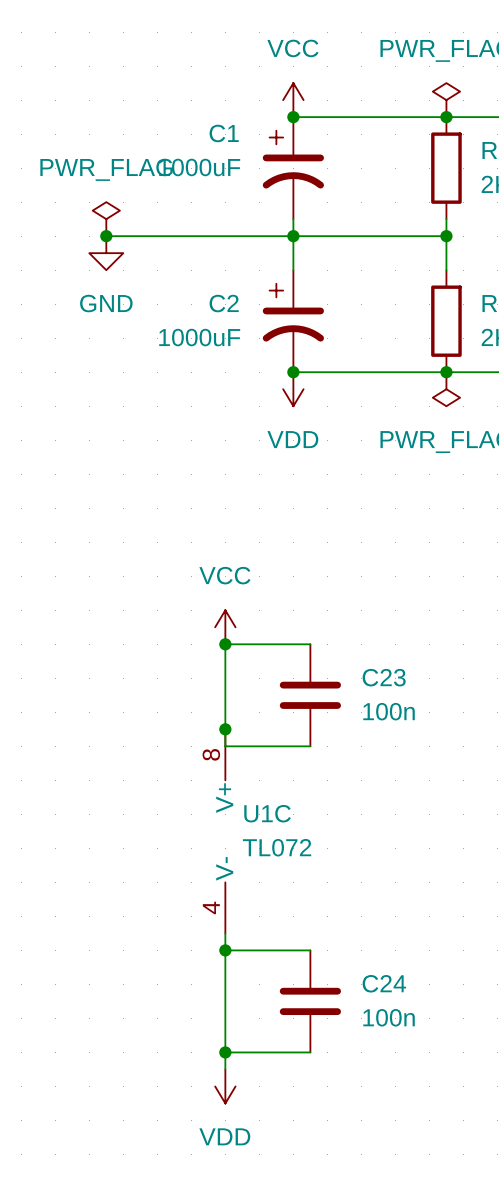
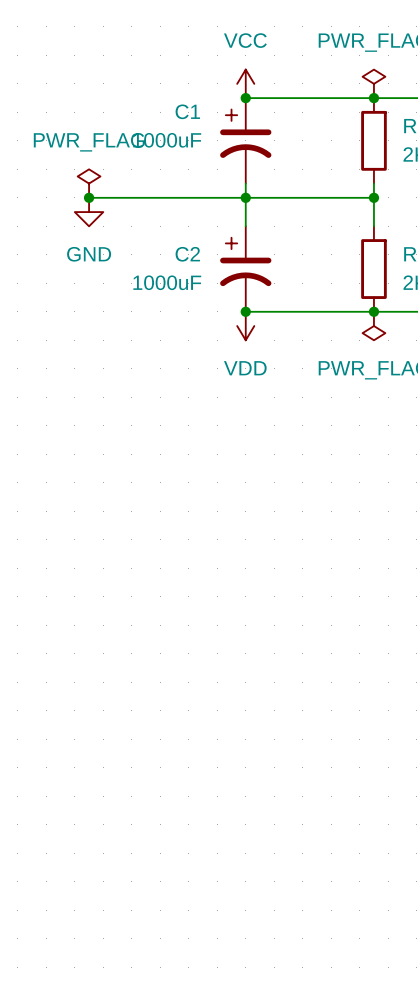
power symbol: VCC (225, 627) -> none
junction: (225, 644) -> none
wire: (310, 644) (225, 644) (225, 746) (310, 746) -> none
C23: 100n (310, 695) -> none
junction: (225, 729) -> none
U1C: TL072 (225, 831) -> none
wire: (225, 933) (225, 1069) -> none
wire: (225, 950) (310, 950) -> none
junction: (225, 950) -> none
C24: 100n (310, 1001) -> none
wire: (225, 1052) (310, 1052) -> none
junction: (225, 1052) -> none
power symbol: VDD (225, 1086) -> none

